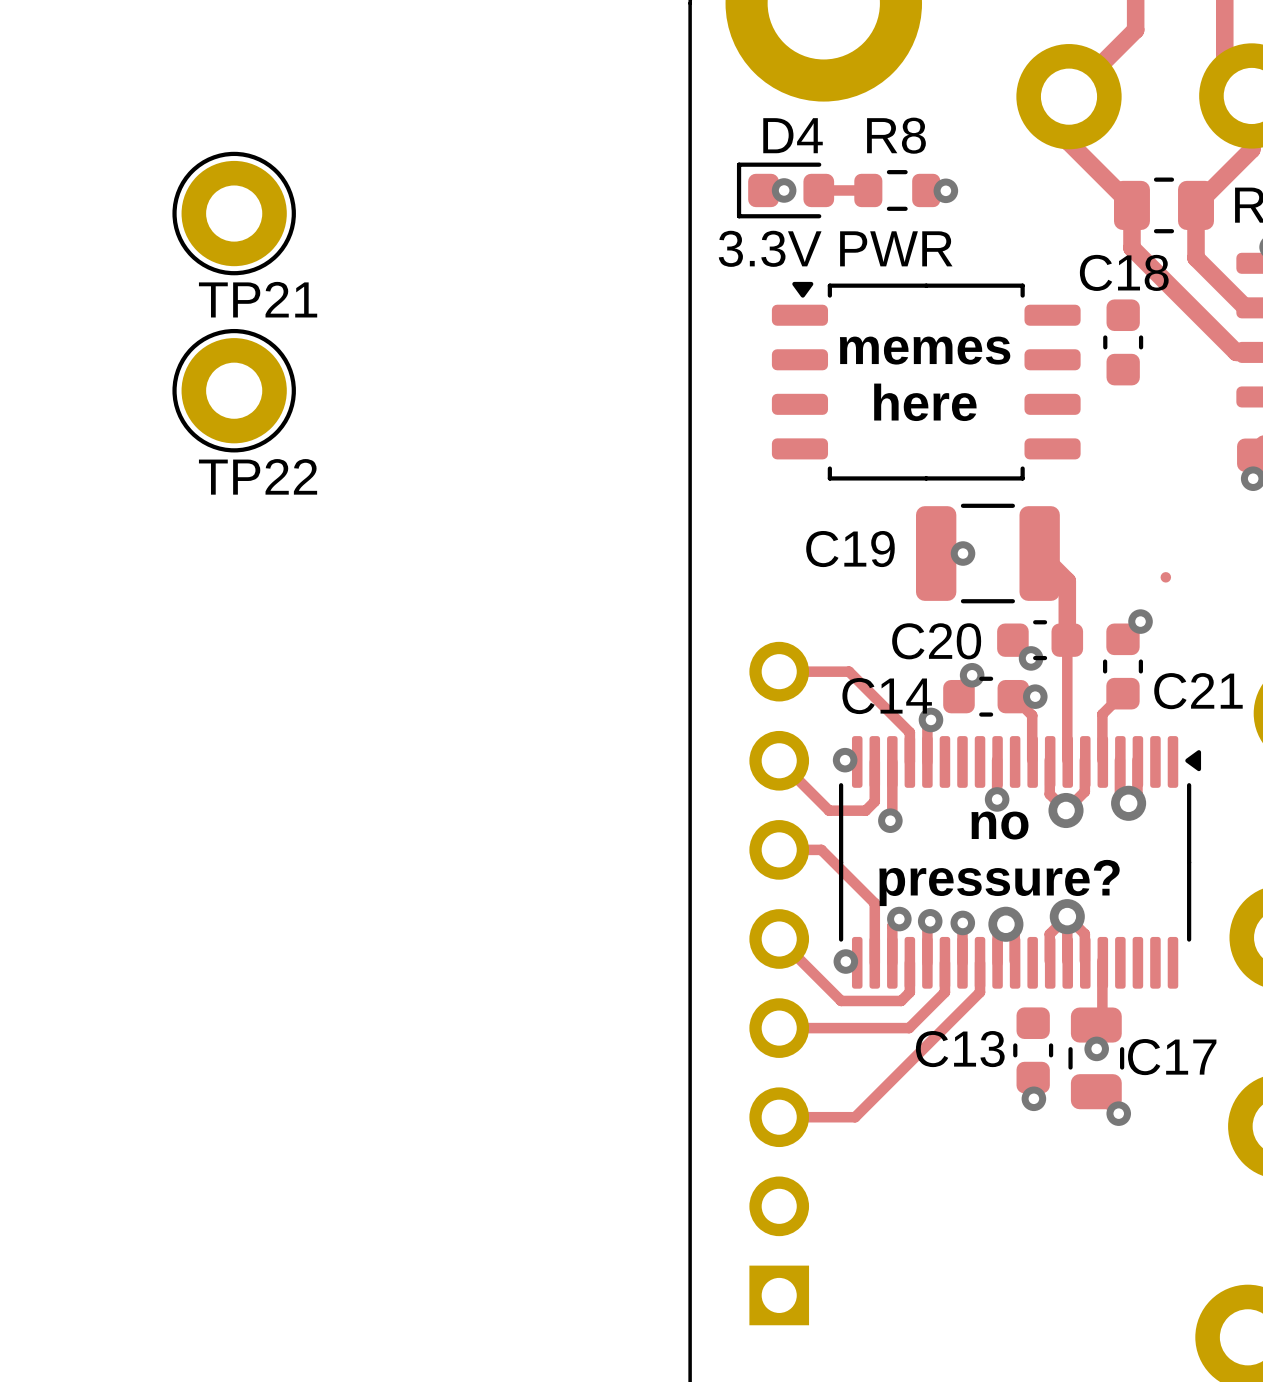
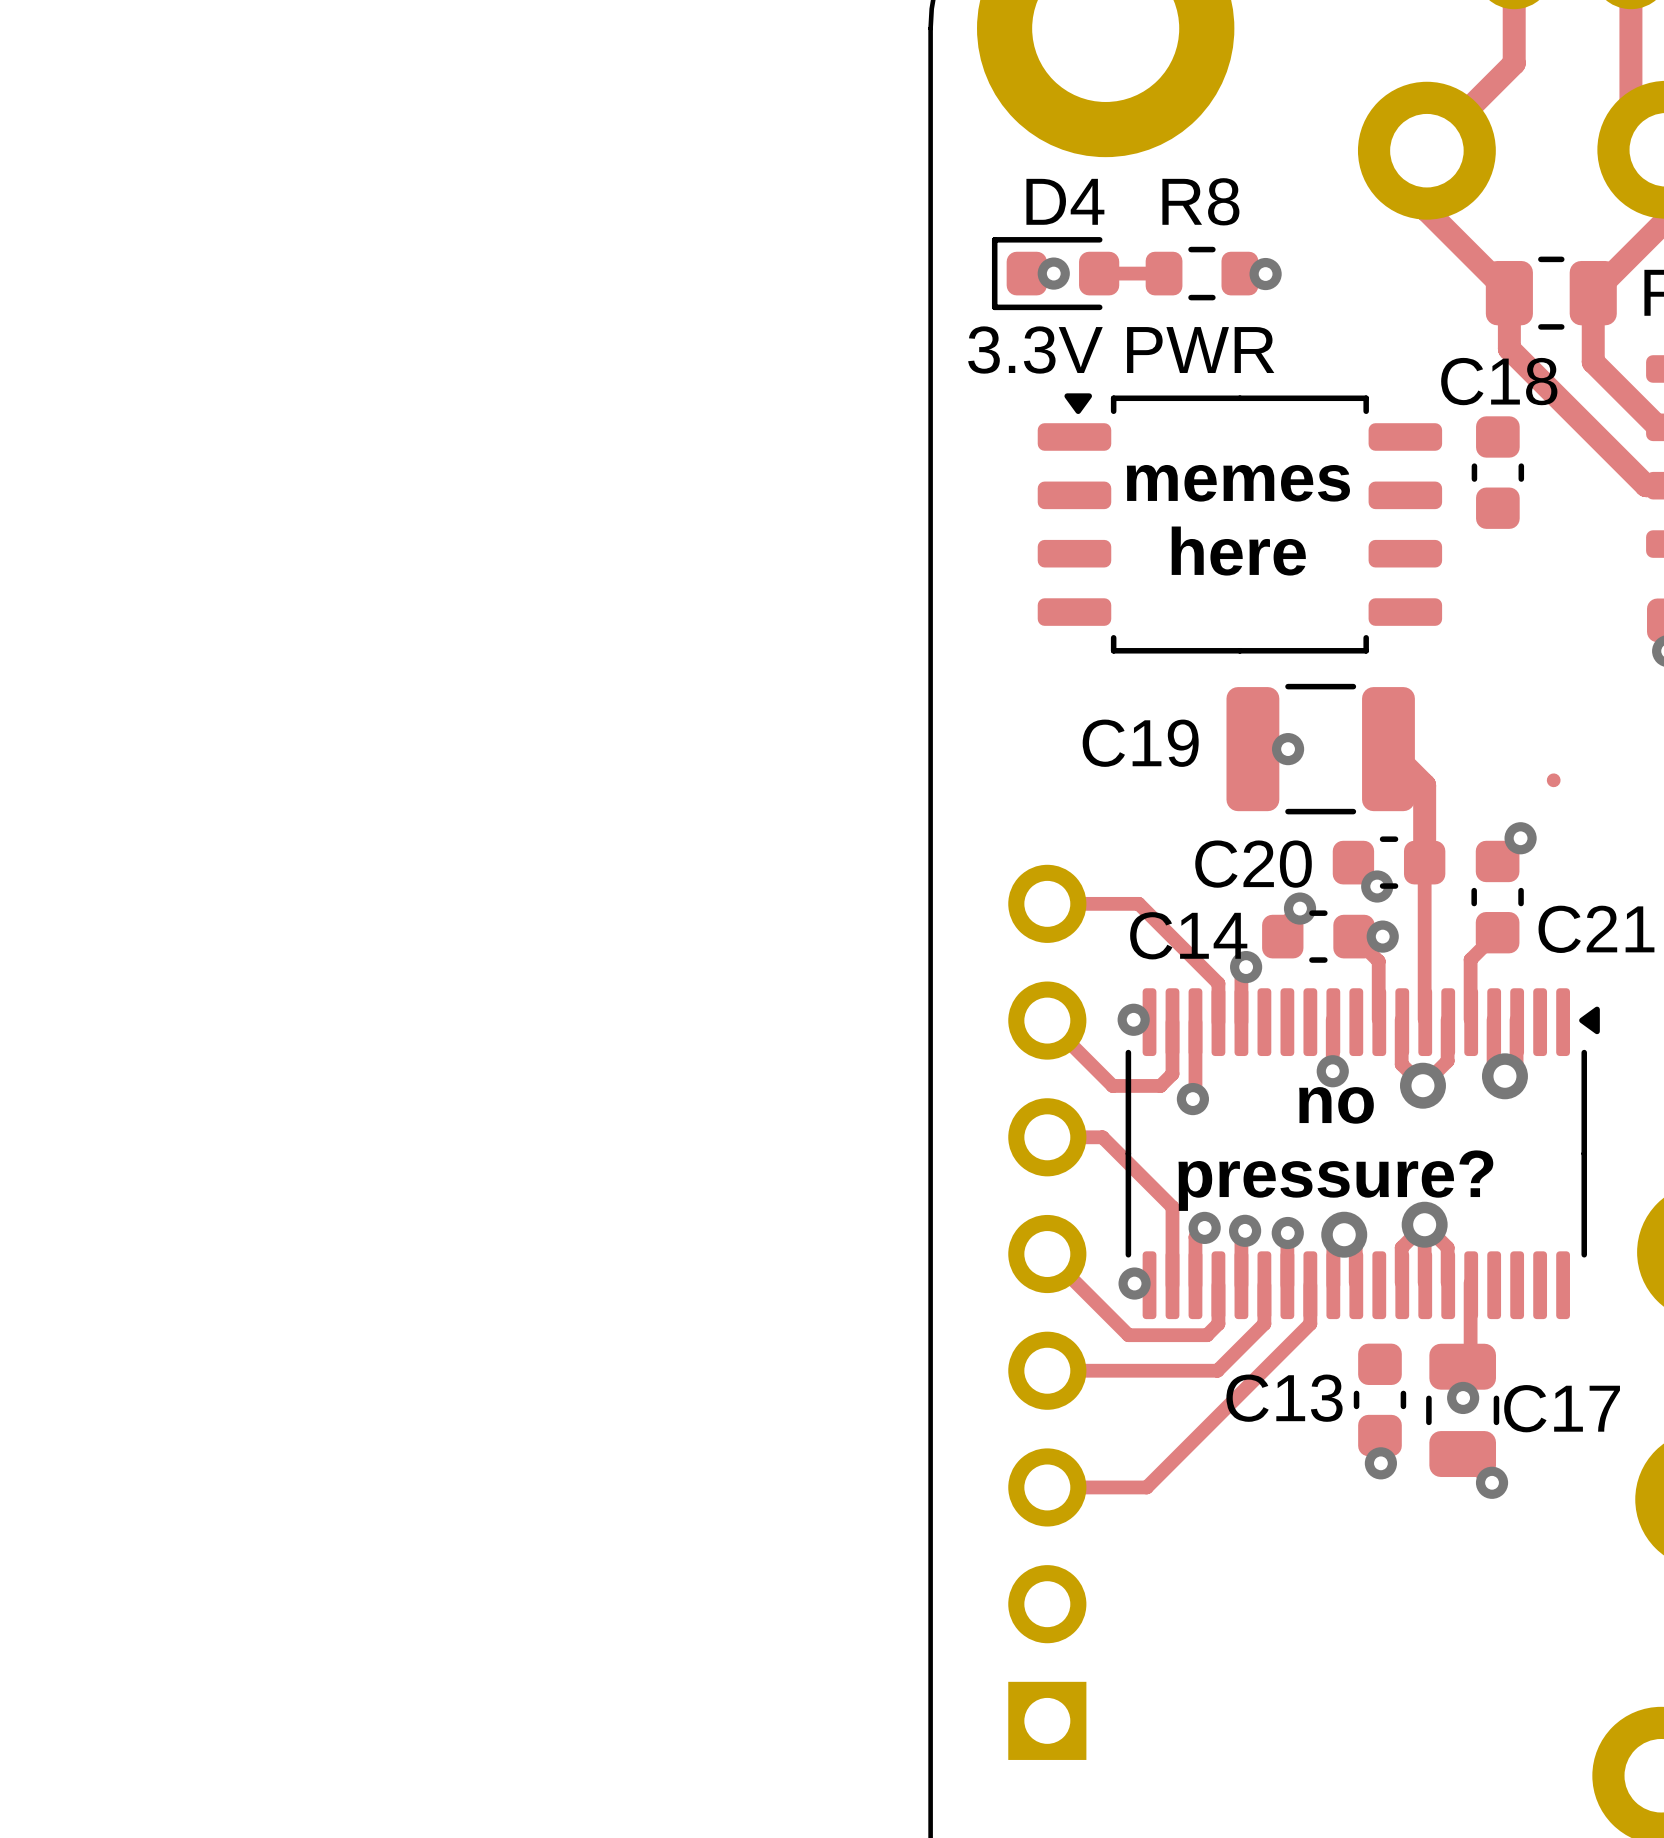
TP21: (234, 213) -> none
TP22: (234, 390) -> none

